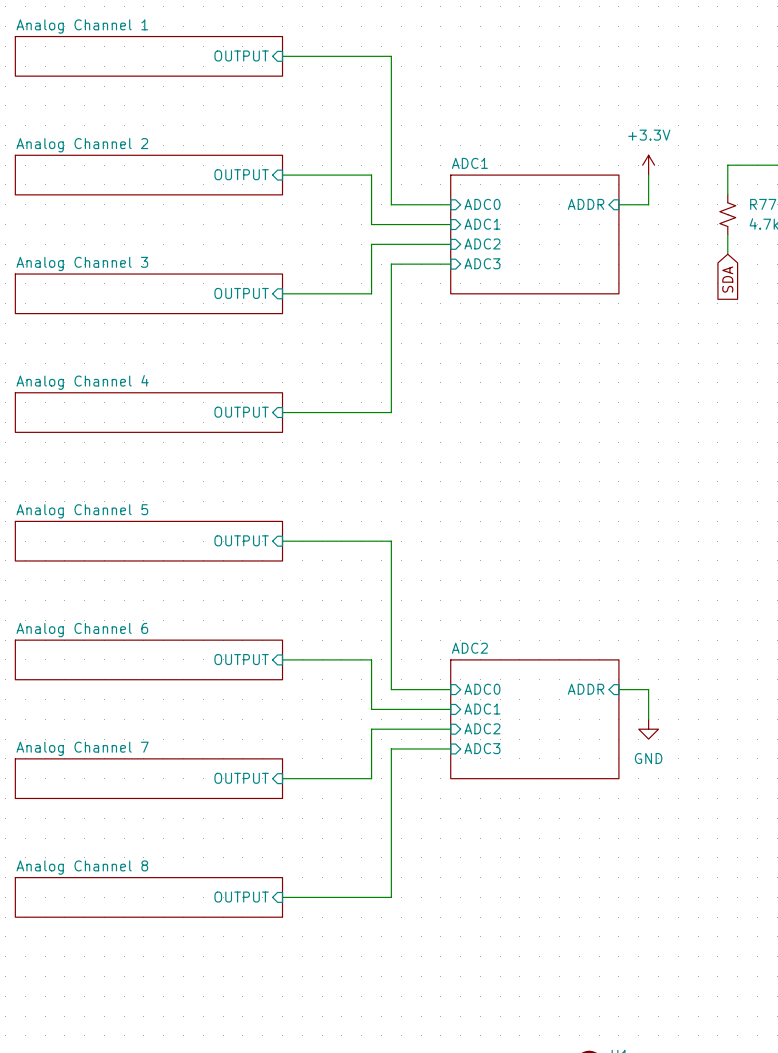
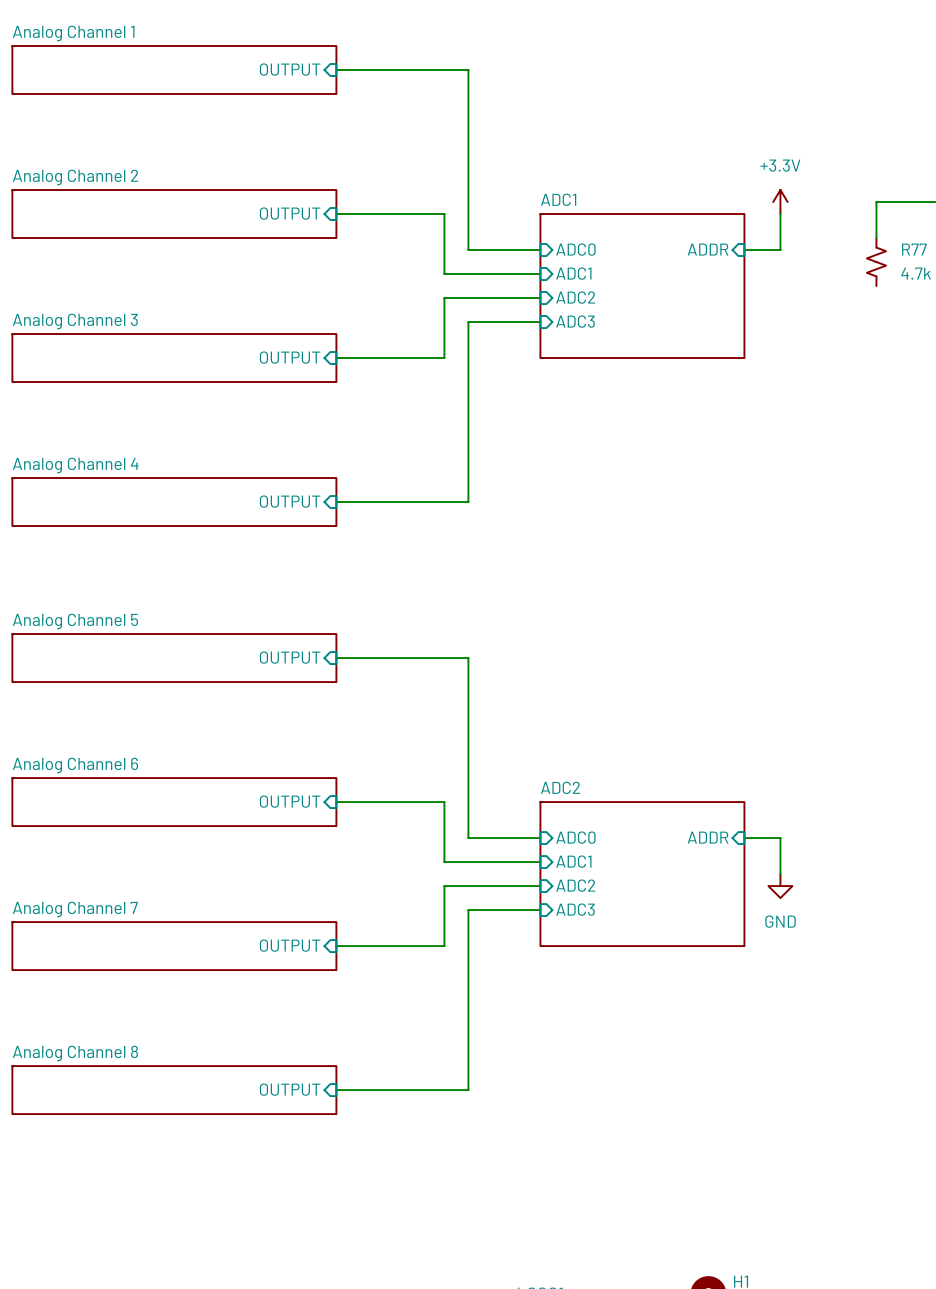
wire: (727, 234) (727, 254) -> none
global label: SDA (727, 279) -> none

